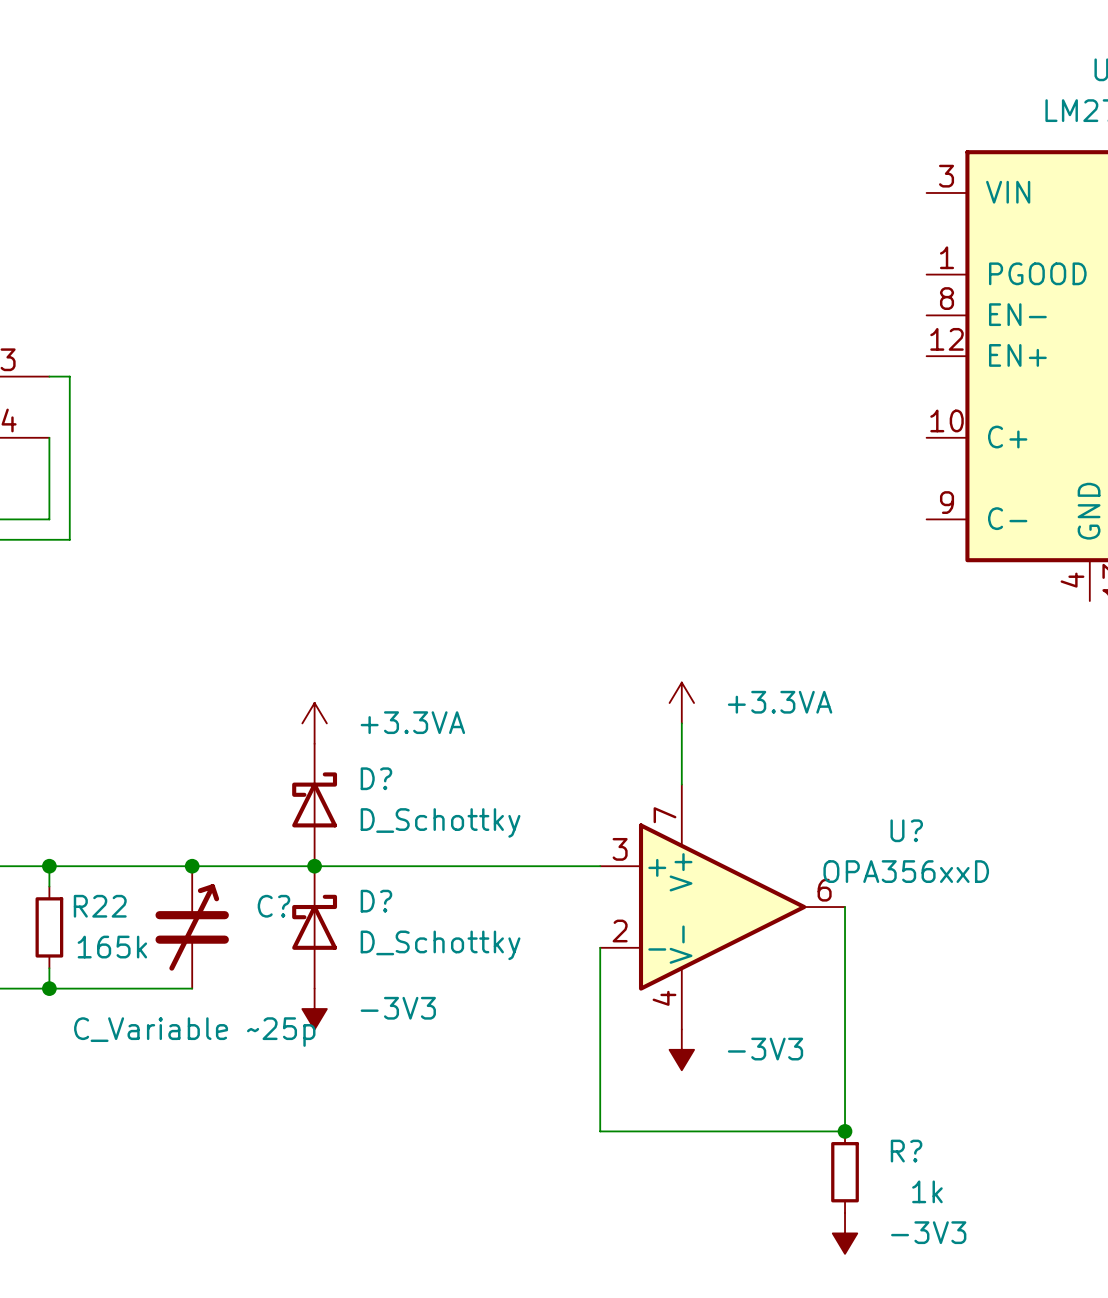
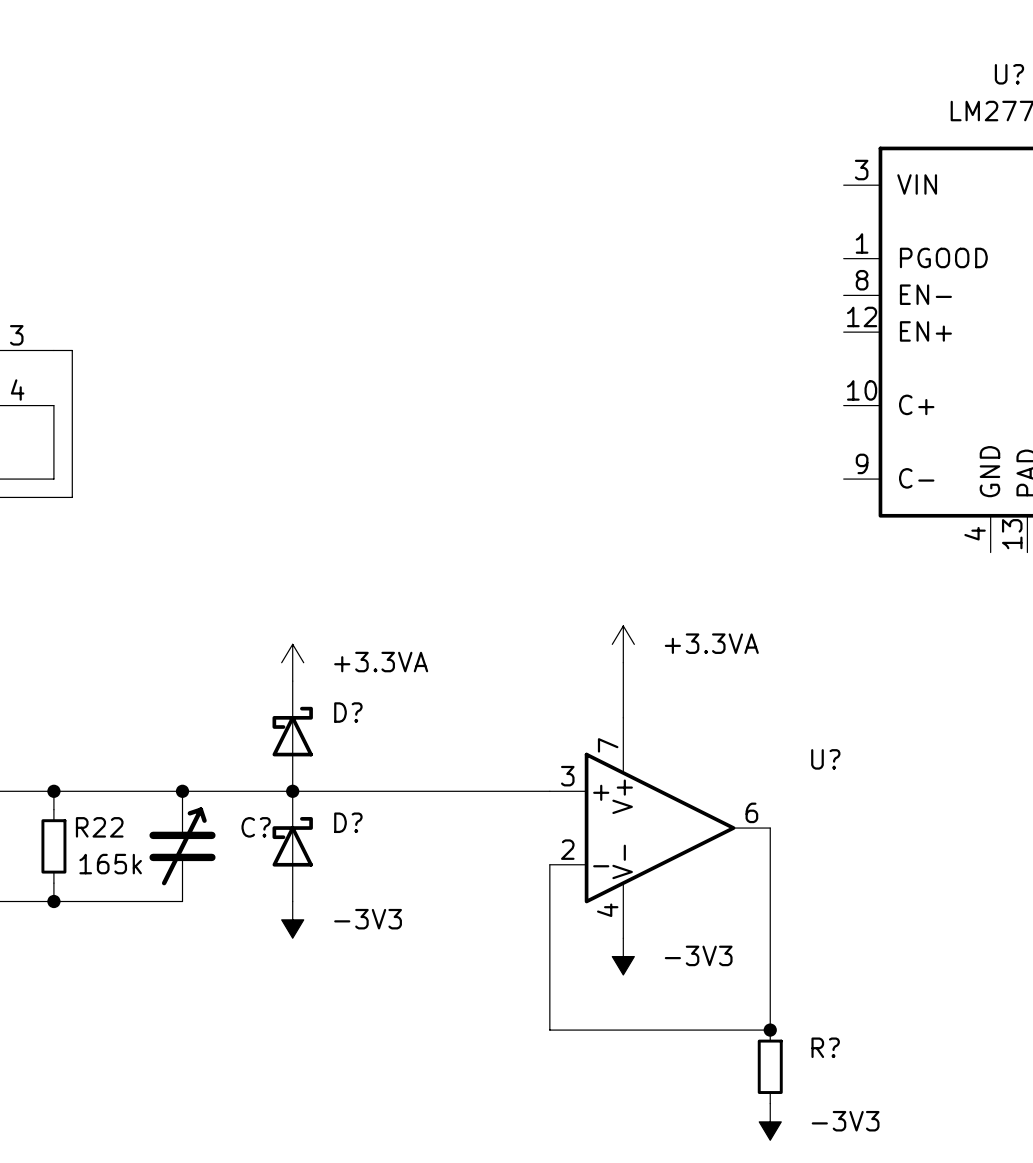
D? value: D_Schottky (440, 822) -> none
U? value: OPA356xxD (906, 871) -> none
D? value: D_Schottky (440, 945) -> none
C? value: C_Variable ~25p (194, 1032) -> none
R? value: 1k (927, 1191) -> none

